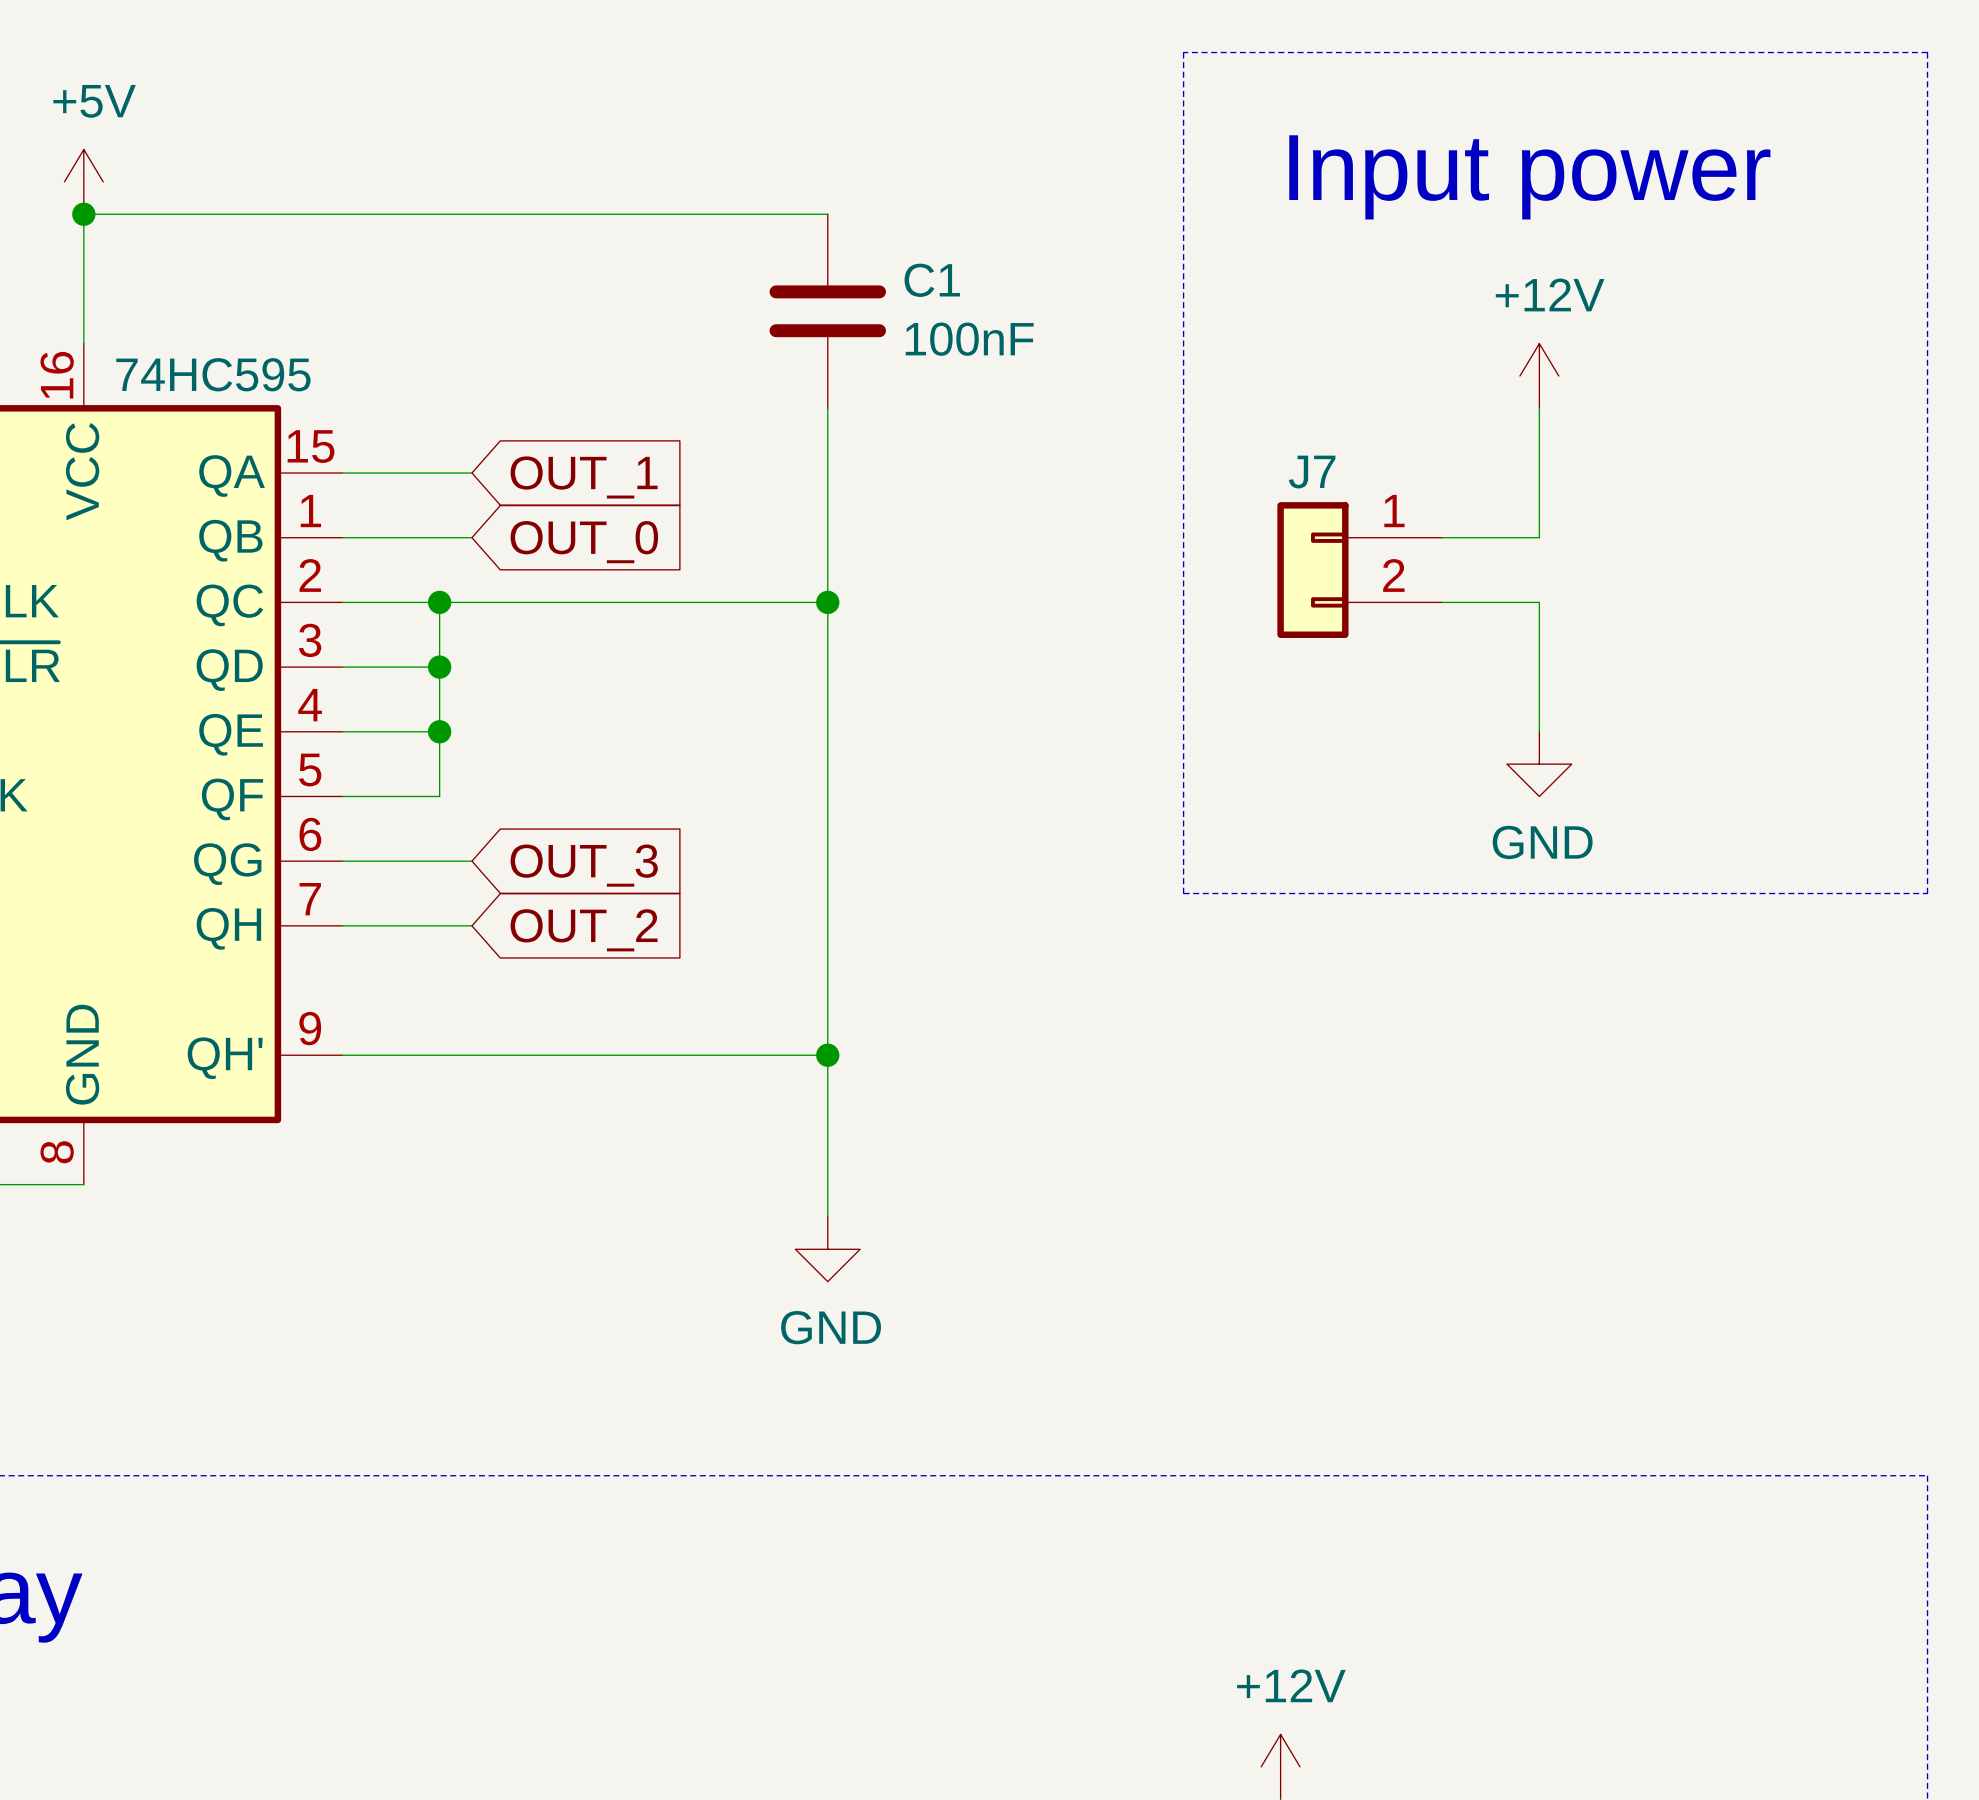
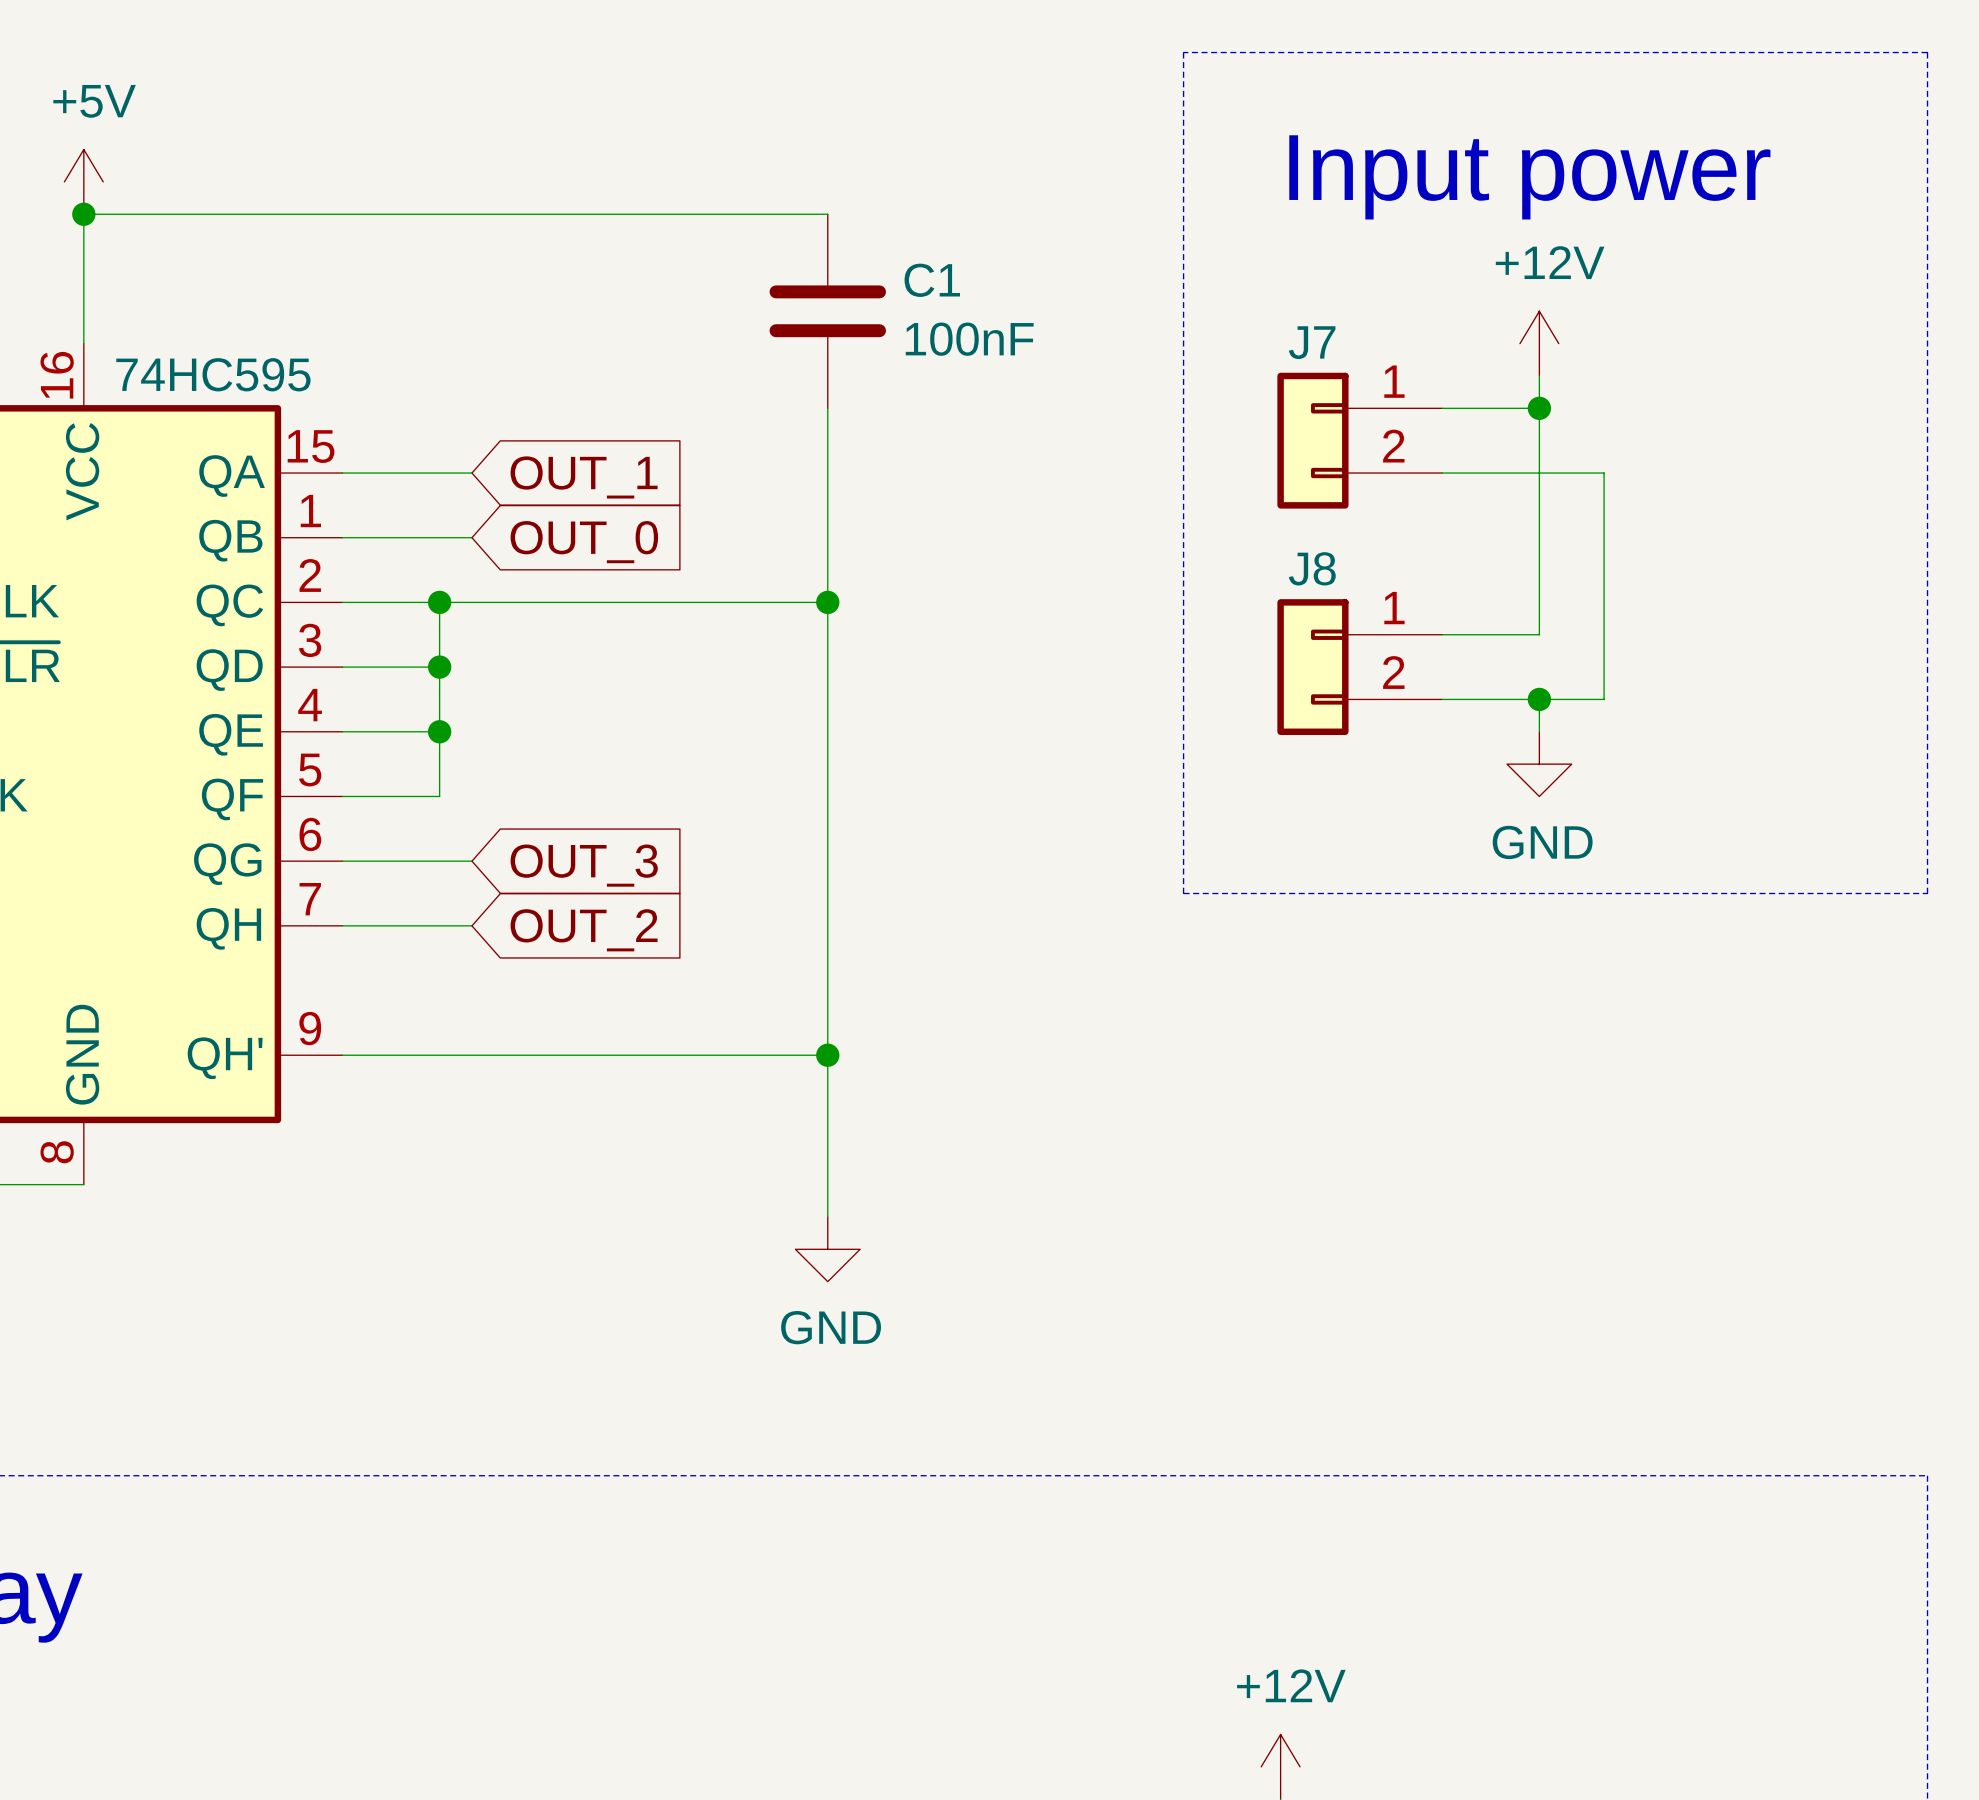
wire: none -> (1539, 375) (1539, 408) (1442, 408)
power symbol position: +12V (1539, 375) -> +12V (1539, 343)
junction: none -> (1539, 408)
wire: none -> (1442, 473) (1604, 473) (1604, 699) (1442, 699)
wire: (1442, 537) (1539, 537) -> (1539, 602) (1539, 537)
J7 position: (1359, 570) -> (1359, 440)
wire: (1442, 602) (1539, 602) -> none
wire: (1539, 634) (1539, 699) -> (1539, 634) (1442, 634)
J8: none -> (1359, 667)
junction: none -> (1539, 699)

